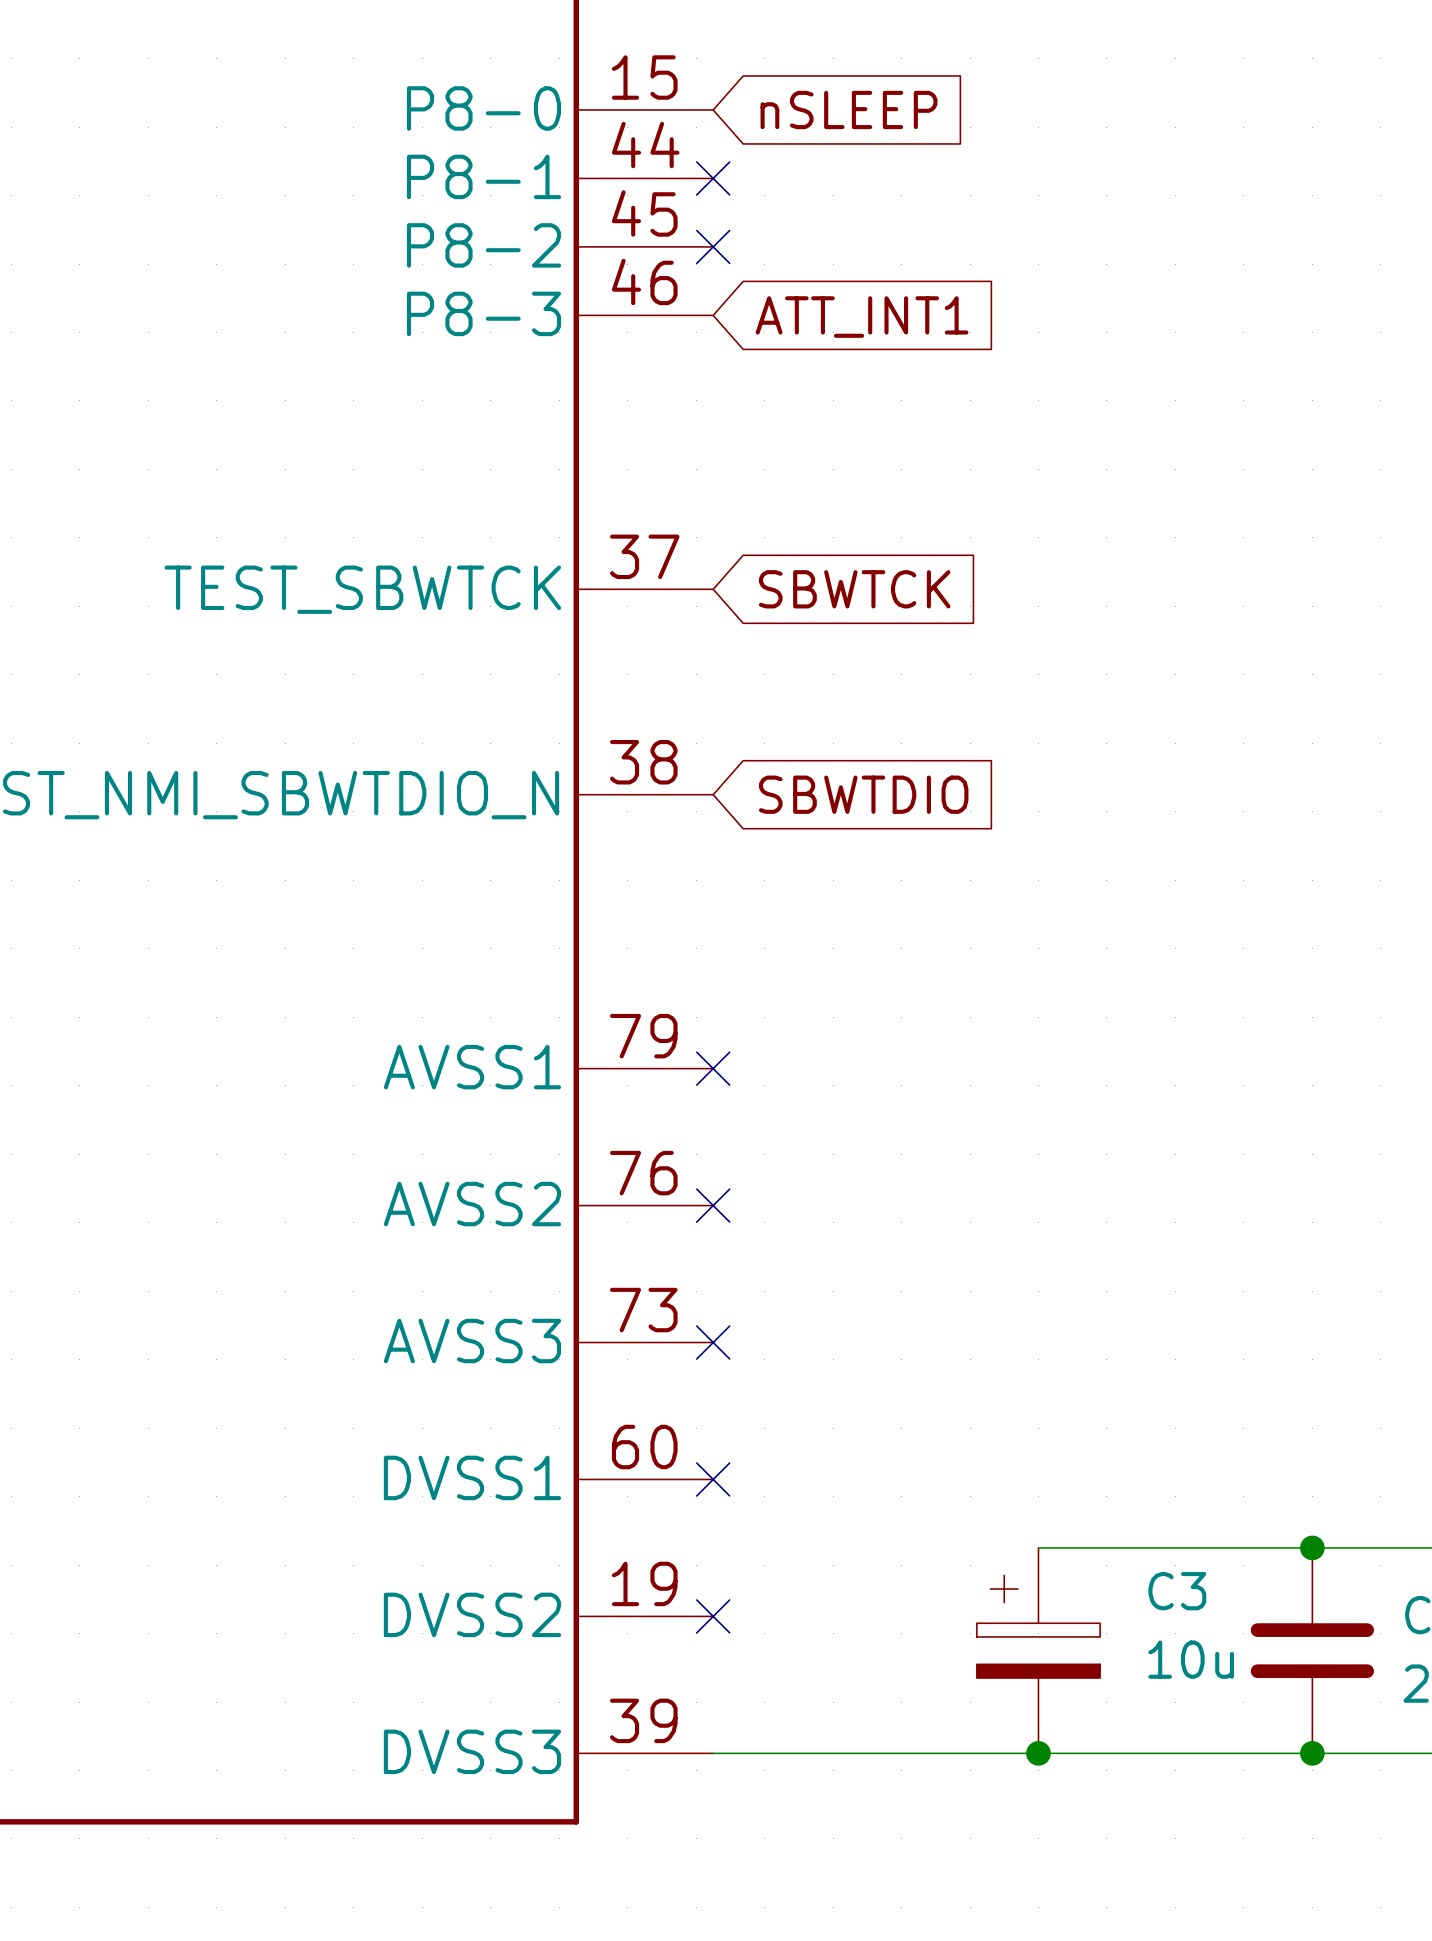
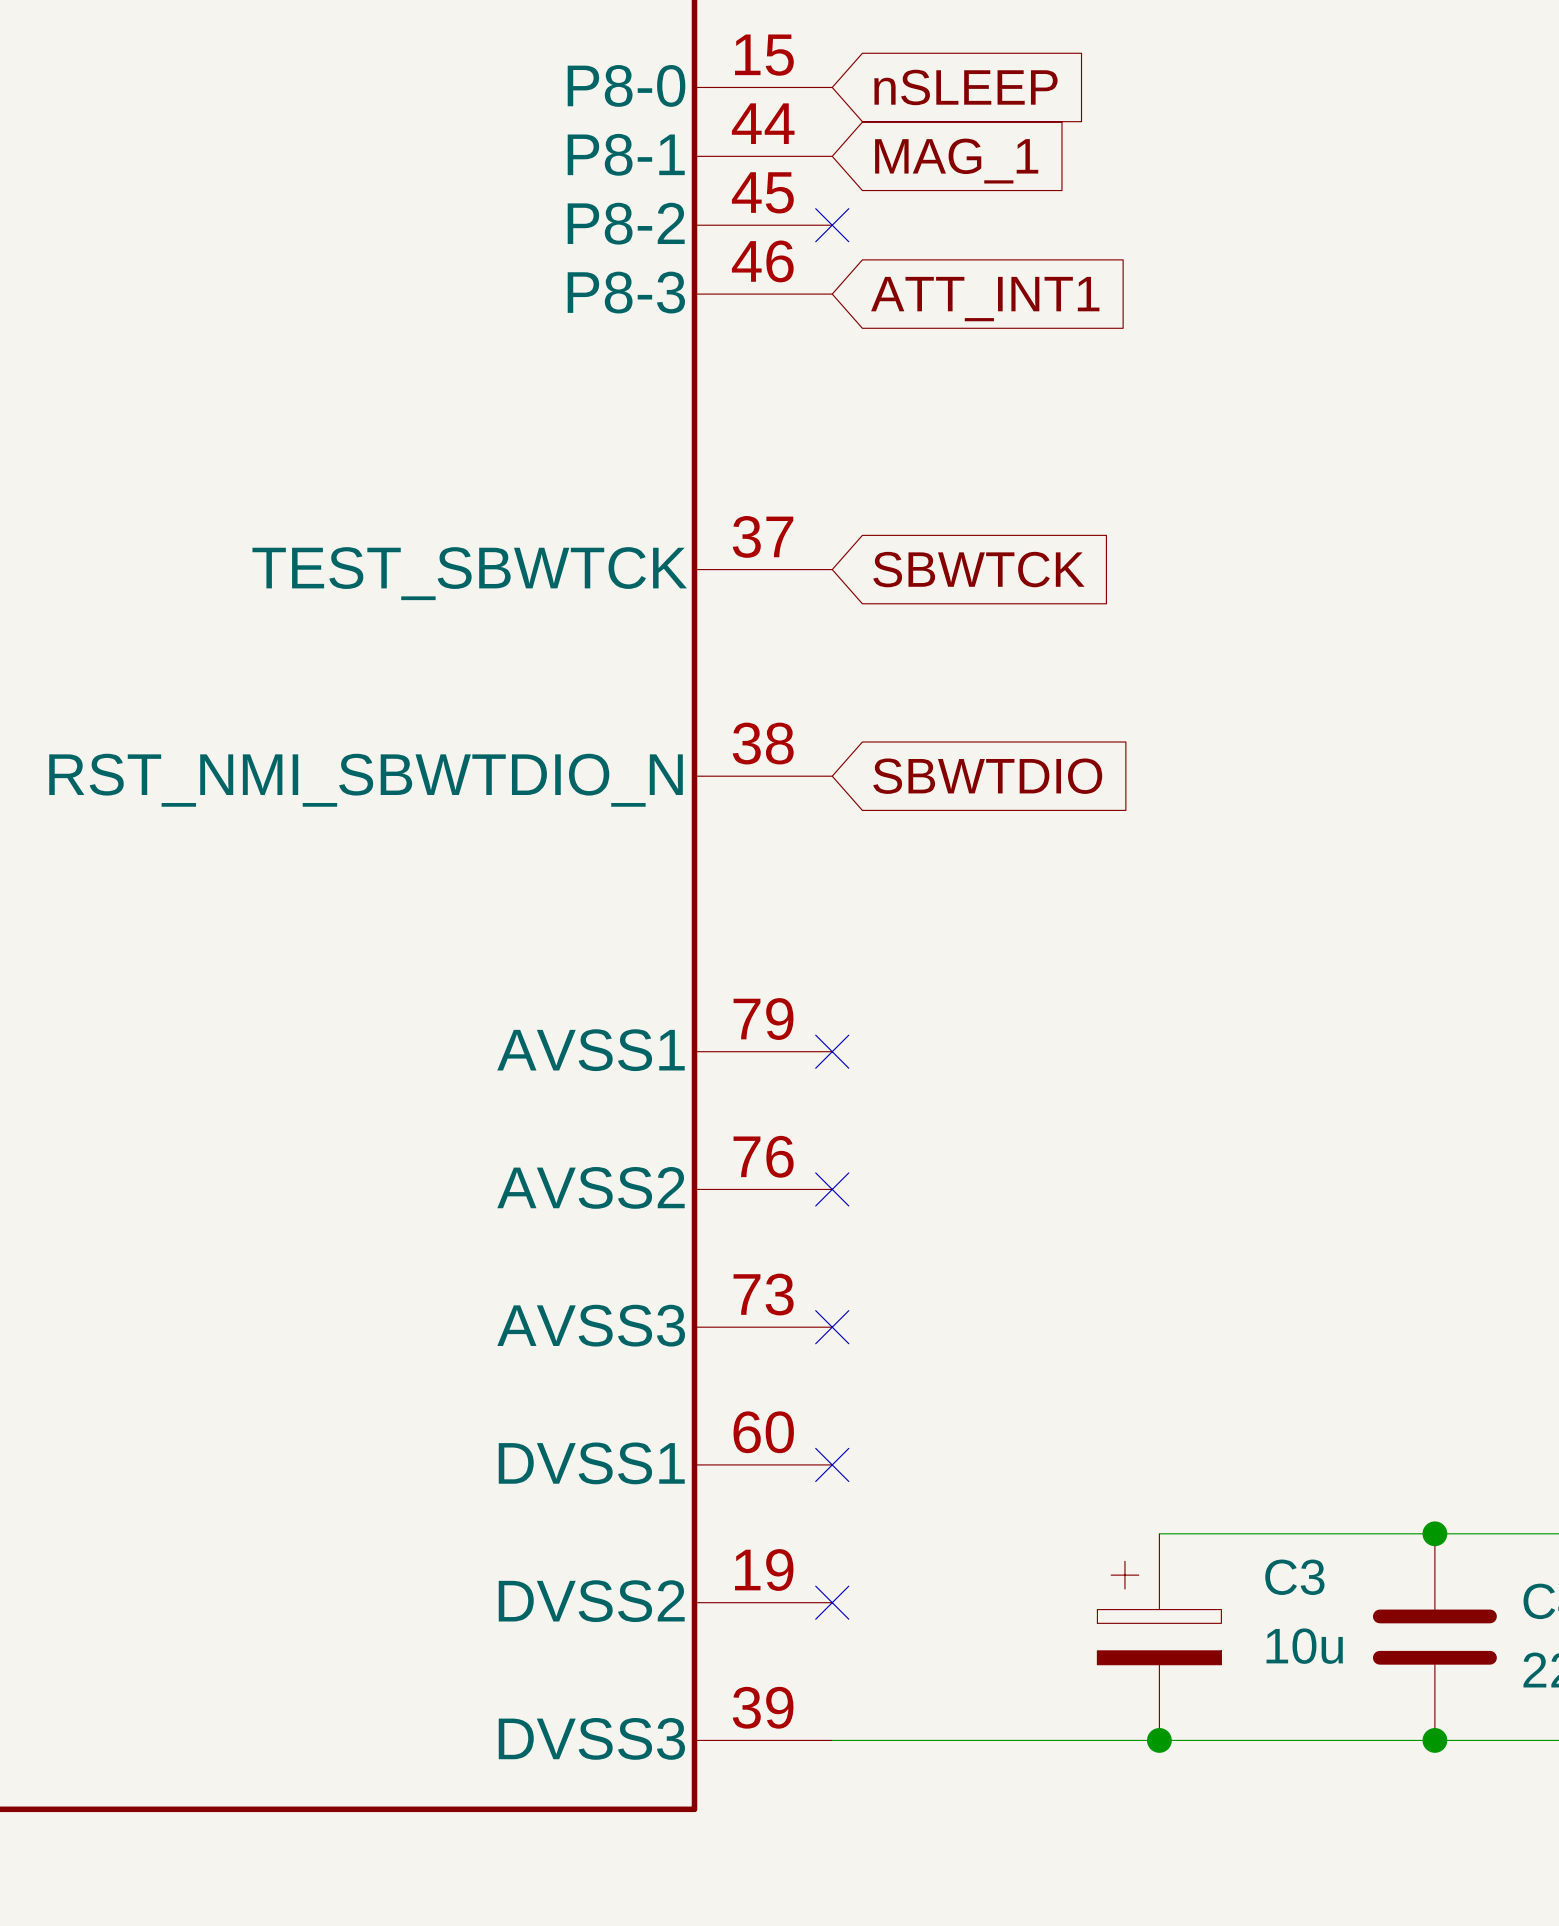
no-connect mark: (713, 178) -> none
global label: none -> MAG_1 (956, 161)

